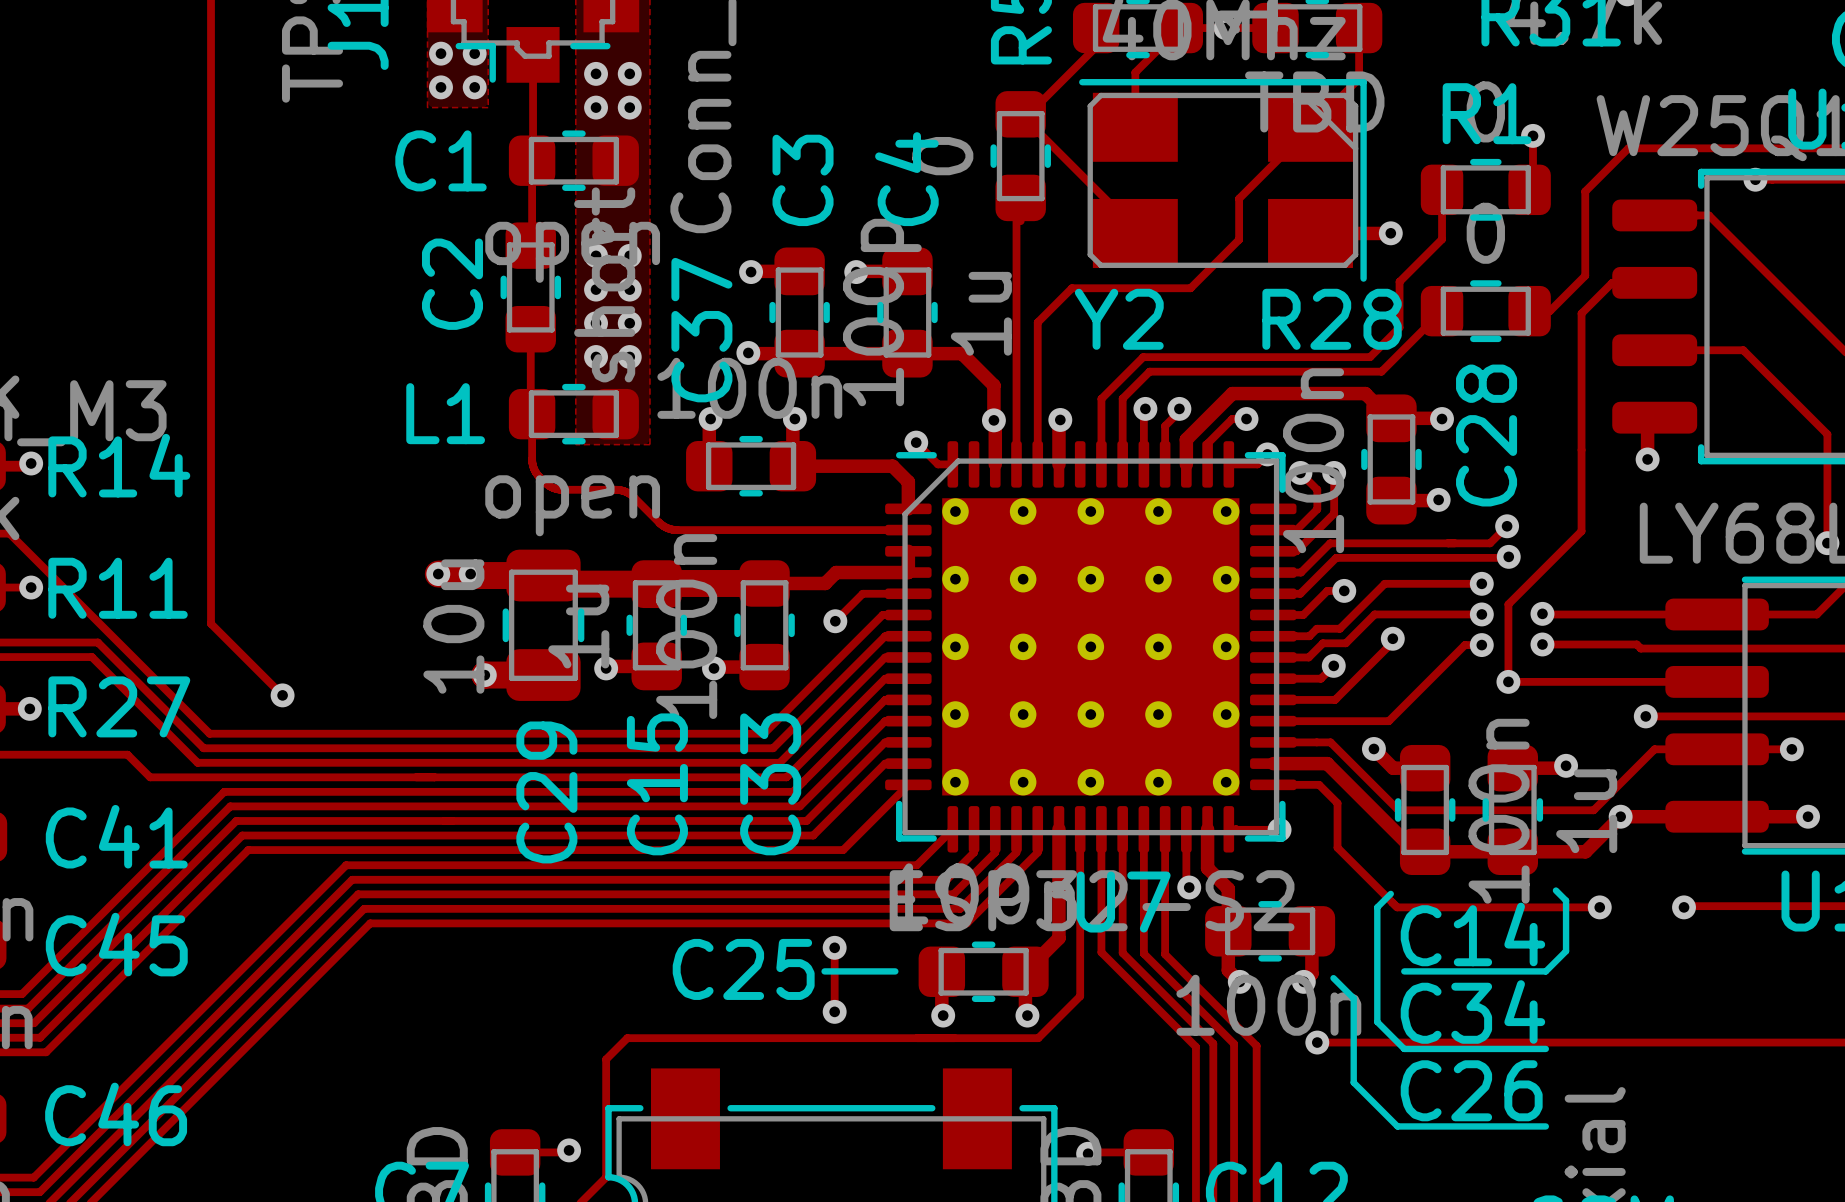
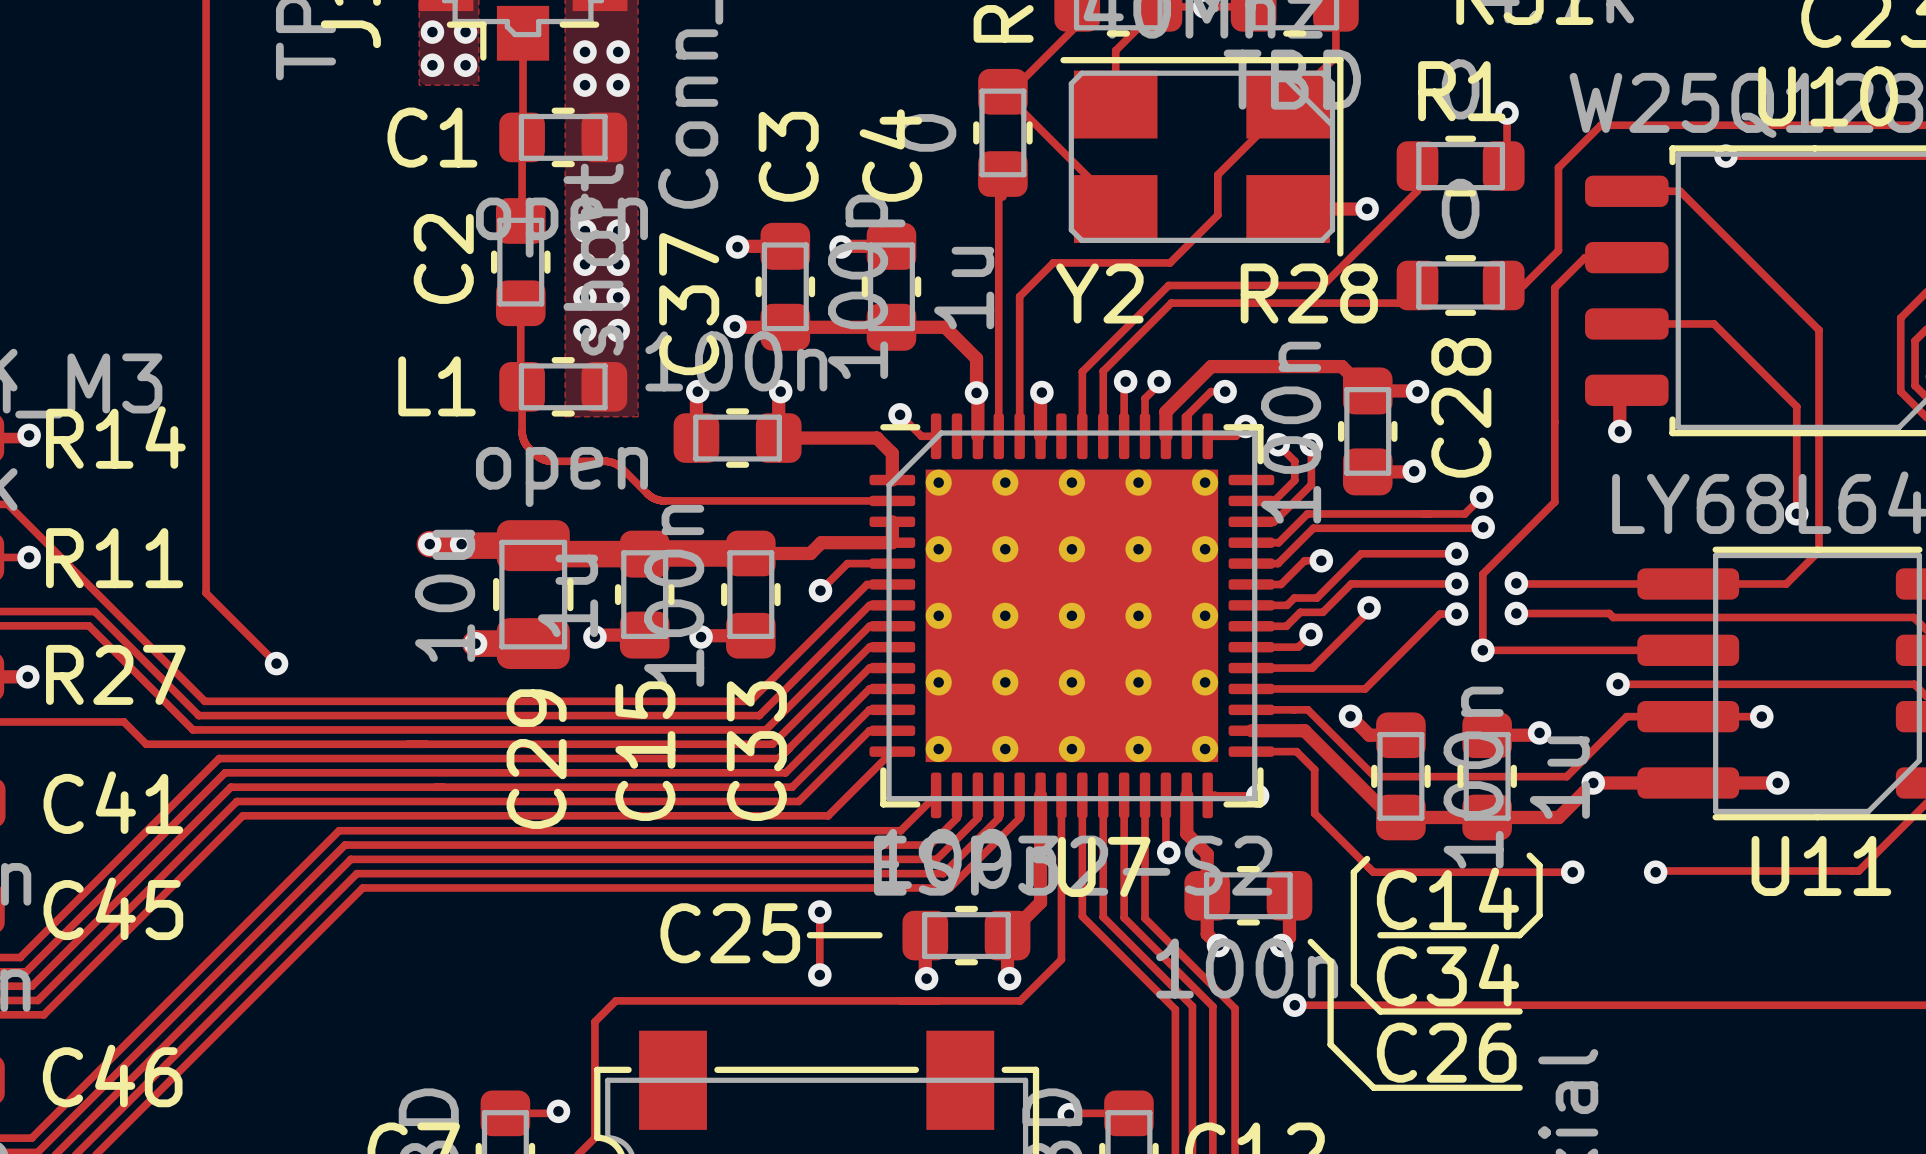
track: (1442, 215) (1442, 239) (1399, 281) (1399, 327) (1370, 357) (1143, 357) -> (1417, 190) (1322, 285) (1168, 285) (1123, 330)
track: (1424, 329) (1381, 371) (1149, 371) -> (1399, 303) (1171, 303) (1129, 345)

